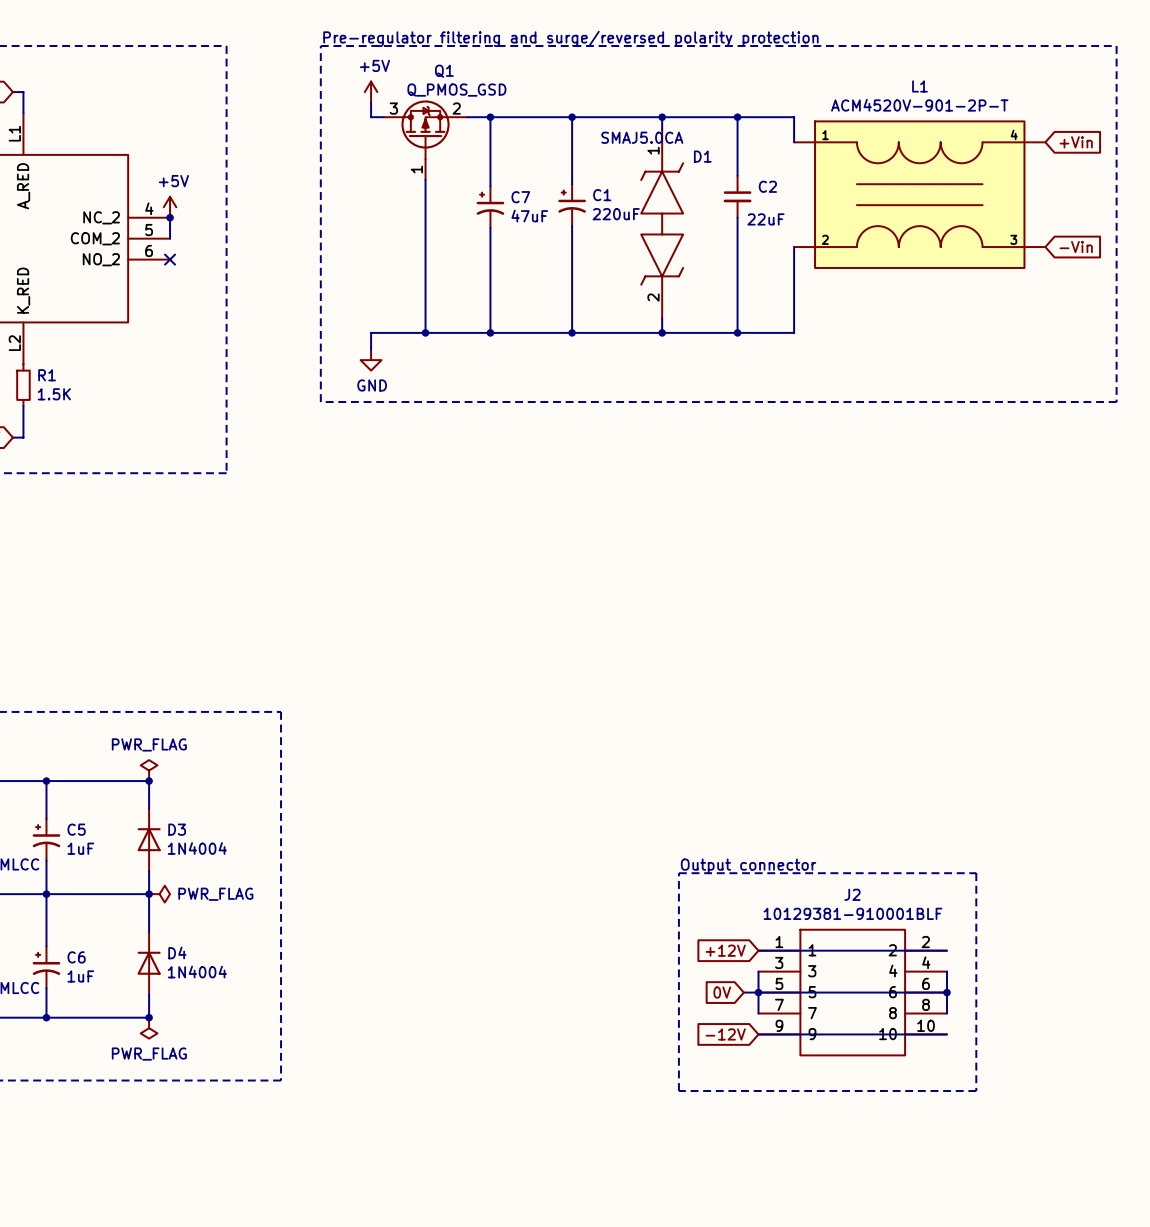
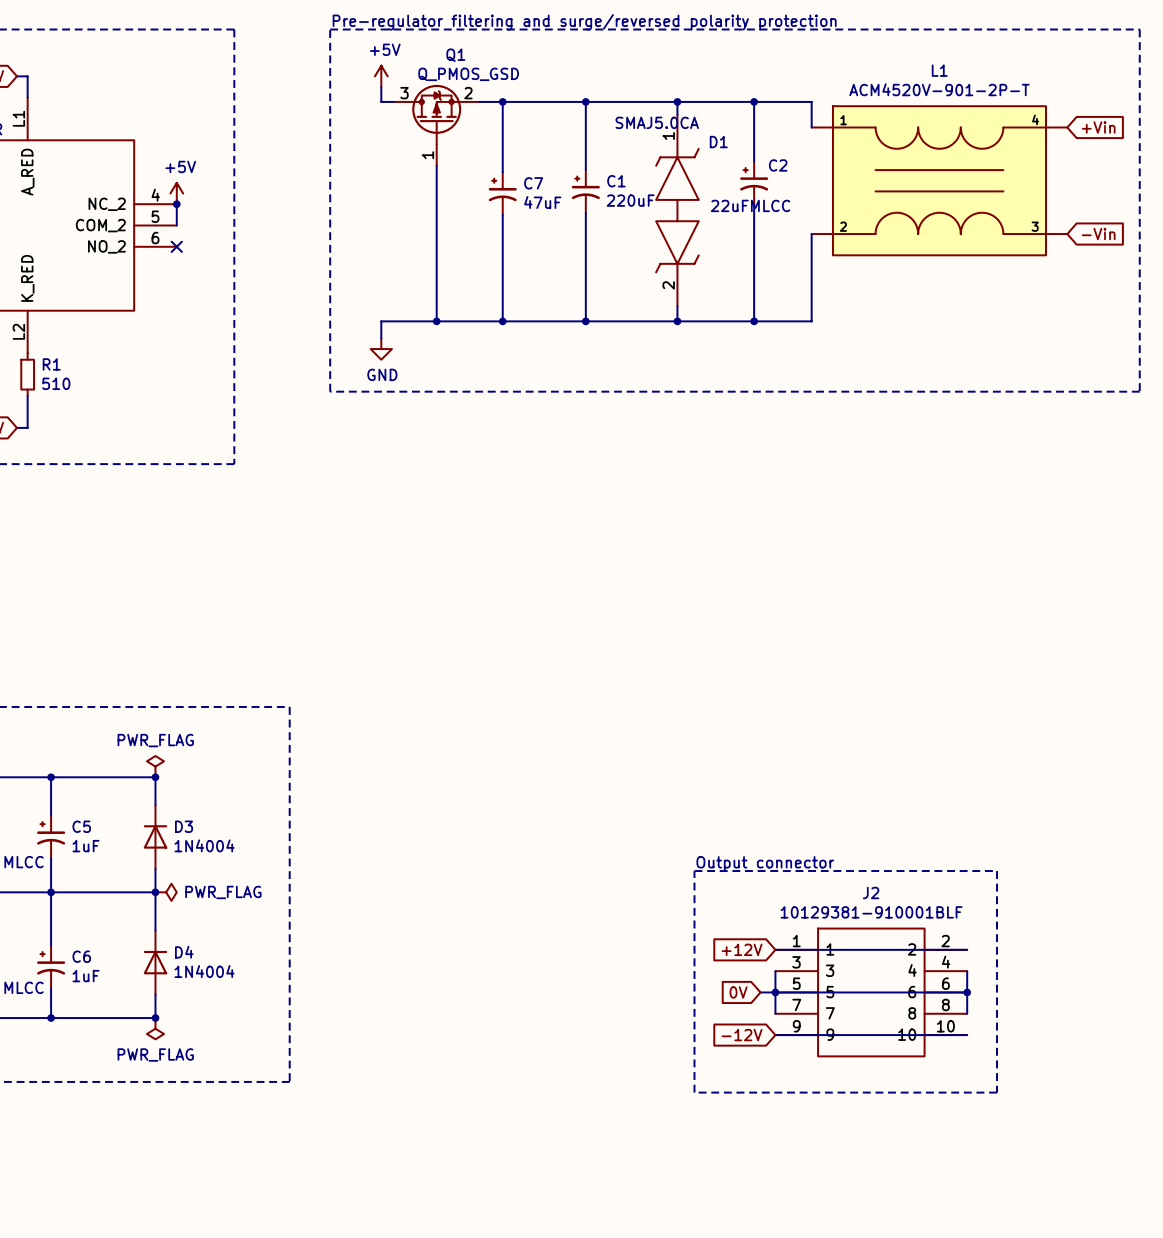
C2 symbol: [723, 175, 752, 218] -> [740, 161, 769, 205]
C2 value: 22uF (765, 219) -> 22uFMLCC (750, 205)
R1 value: 1.5K (54, 394) -> 510 (56, 383)

